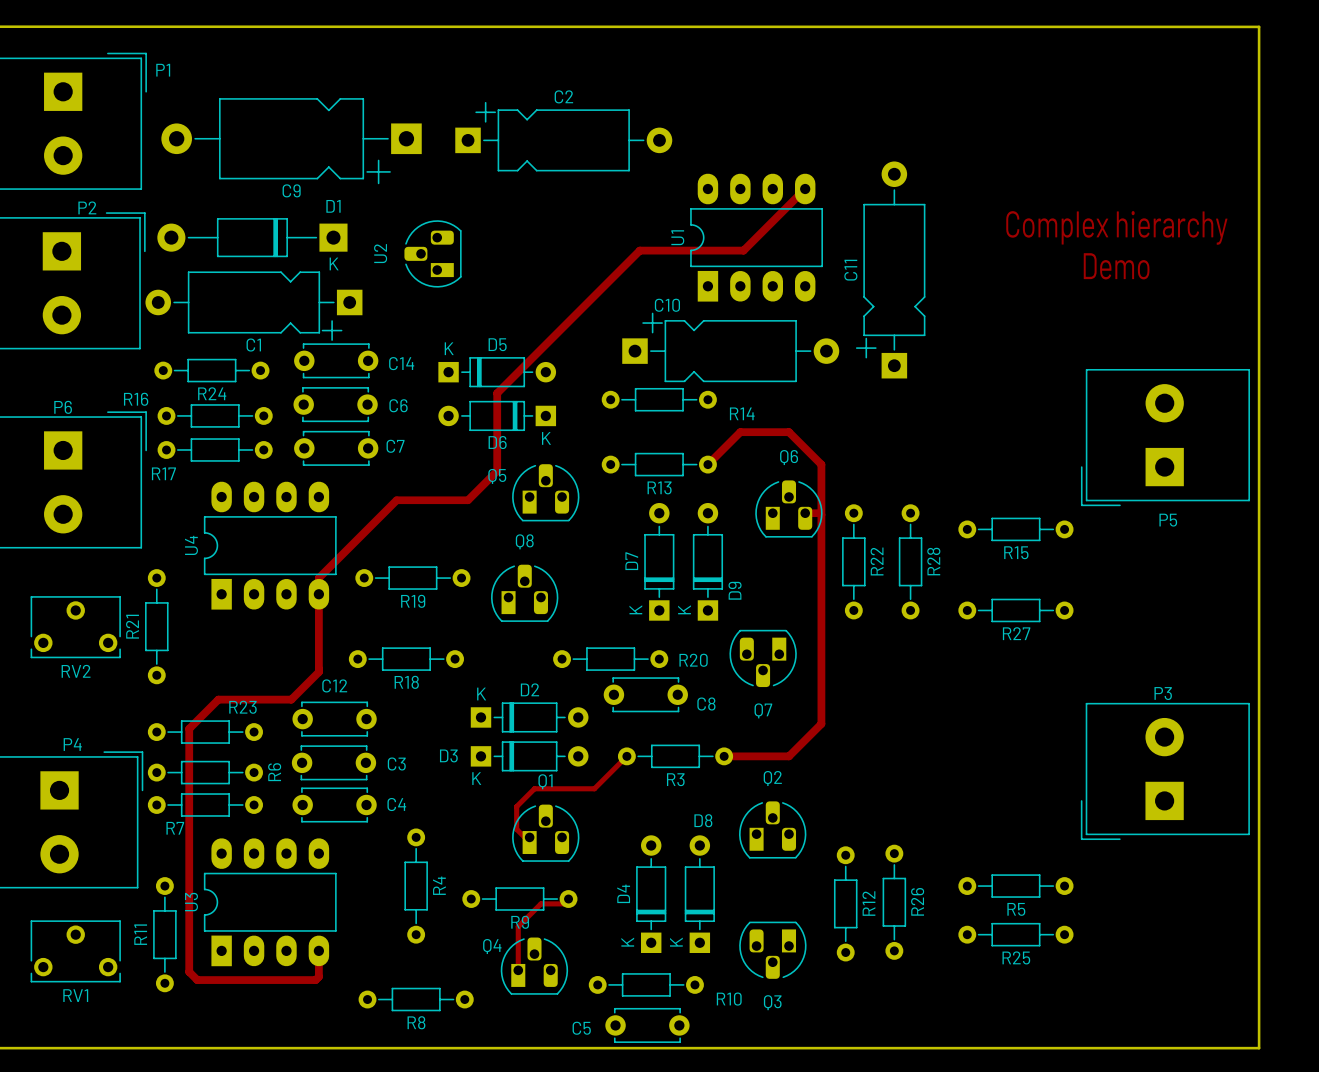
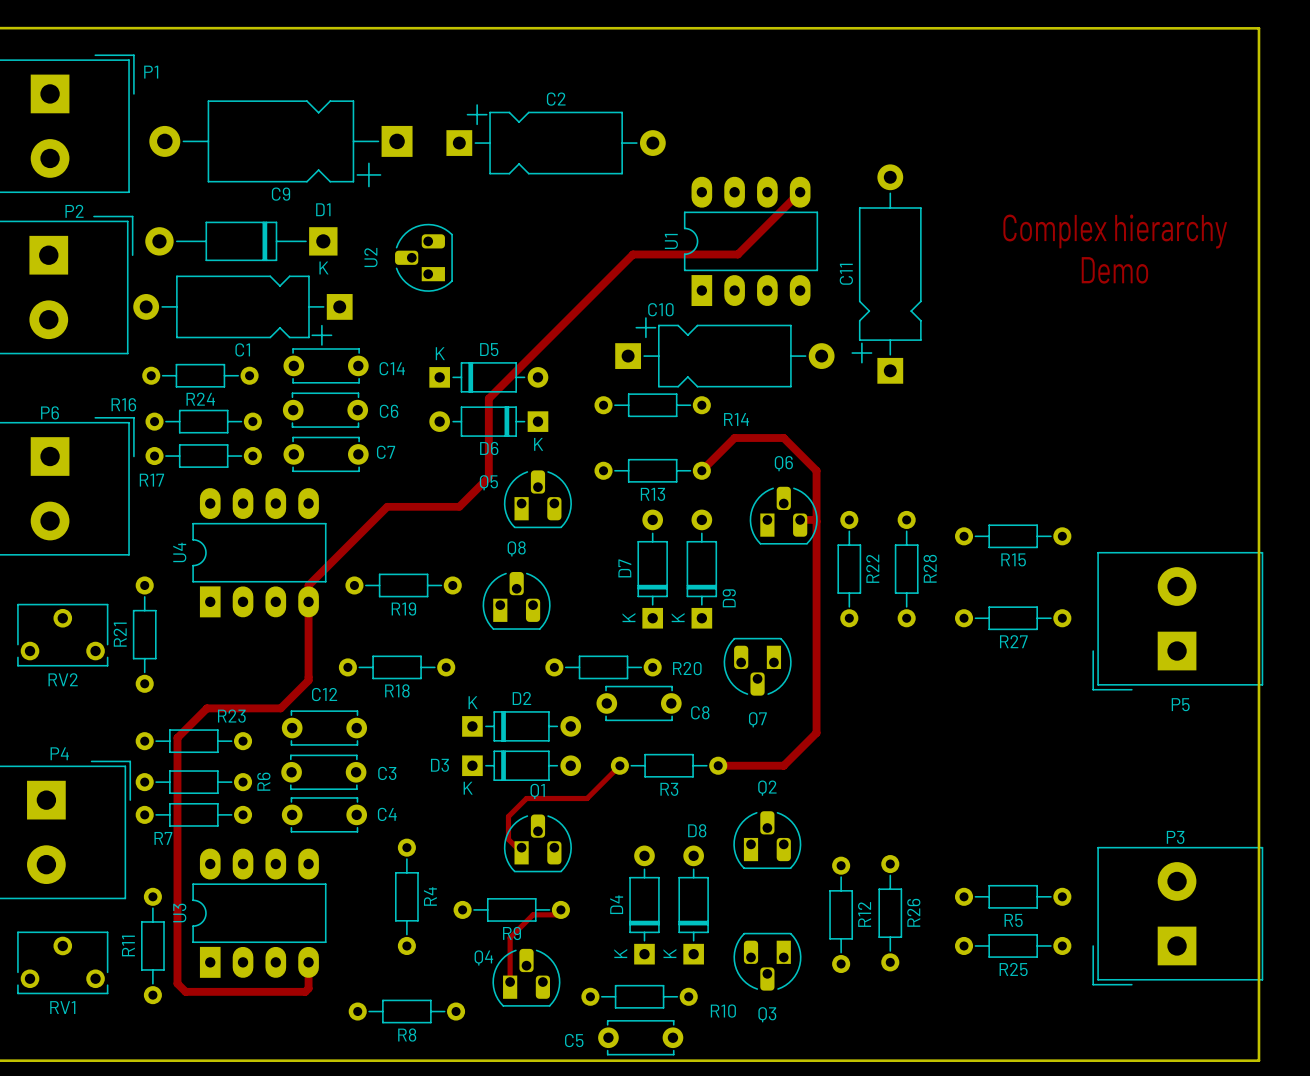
P5 position: (1165, 437) -> (1177, 621)
P3 position: (1165, 771) -> (1177, 916)

